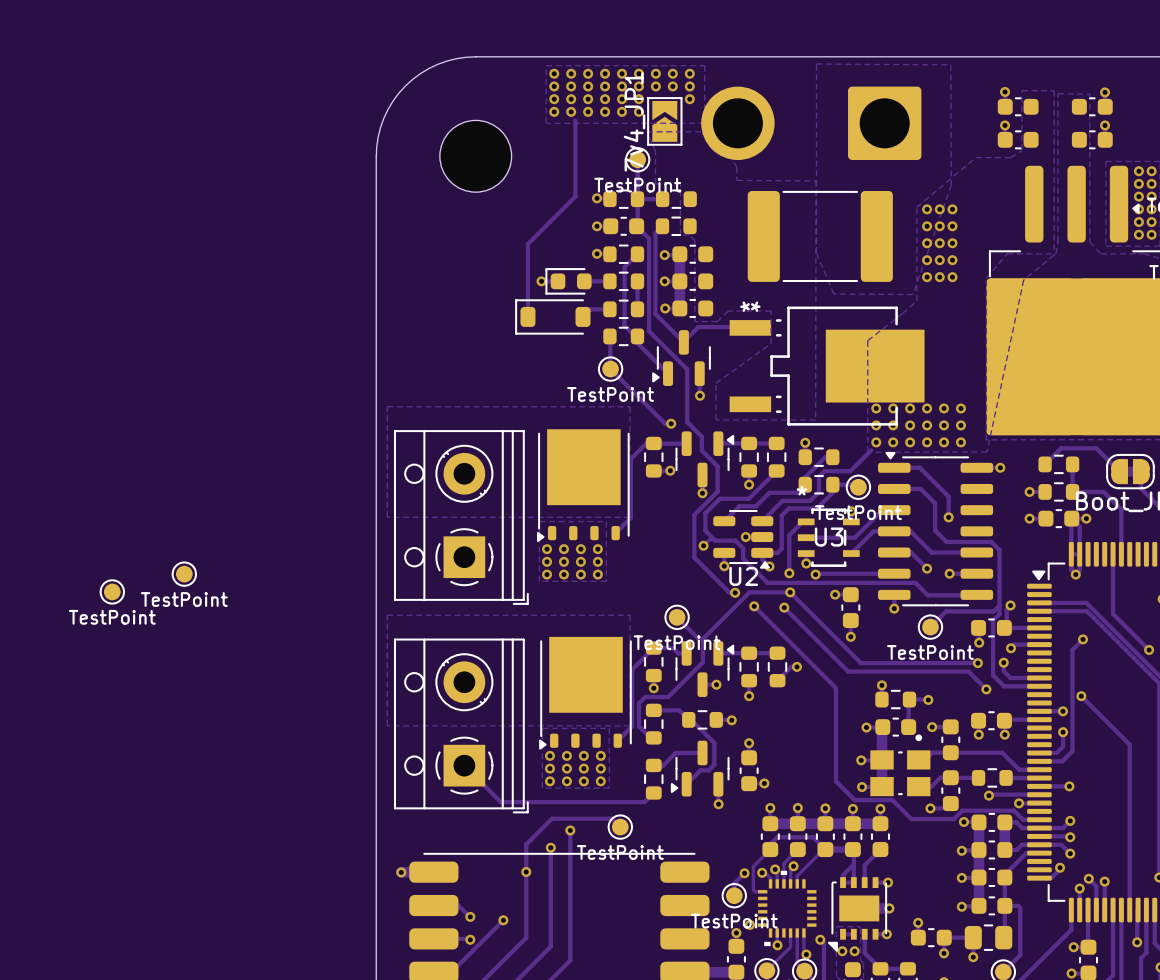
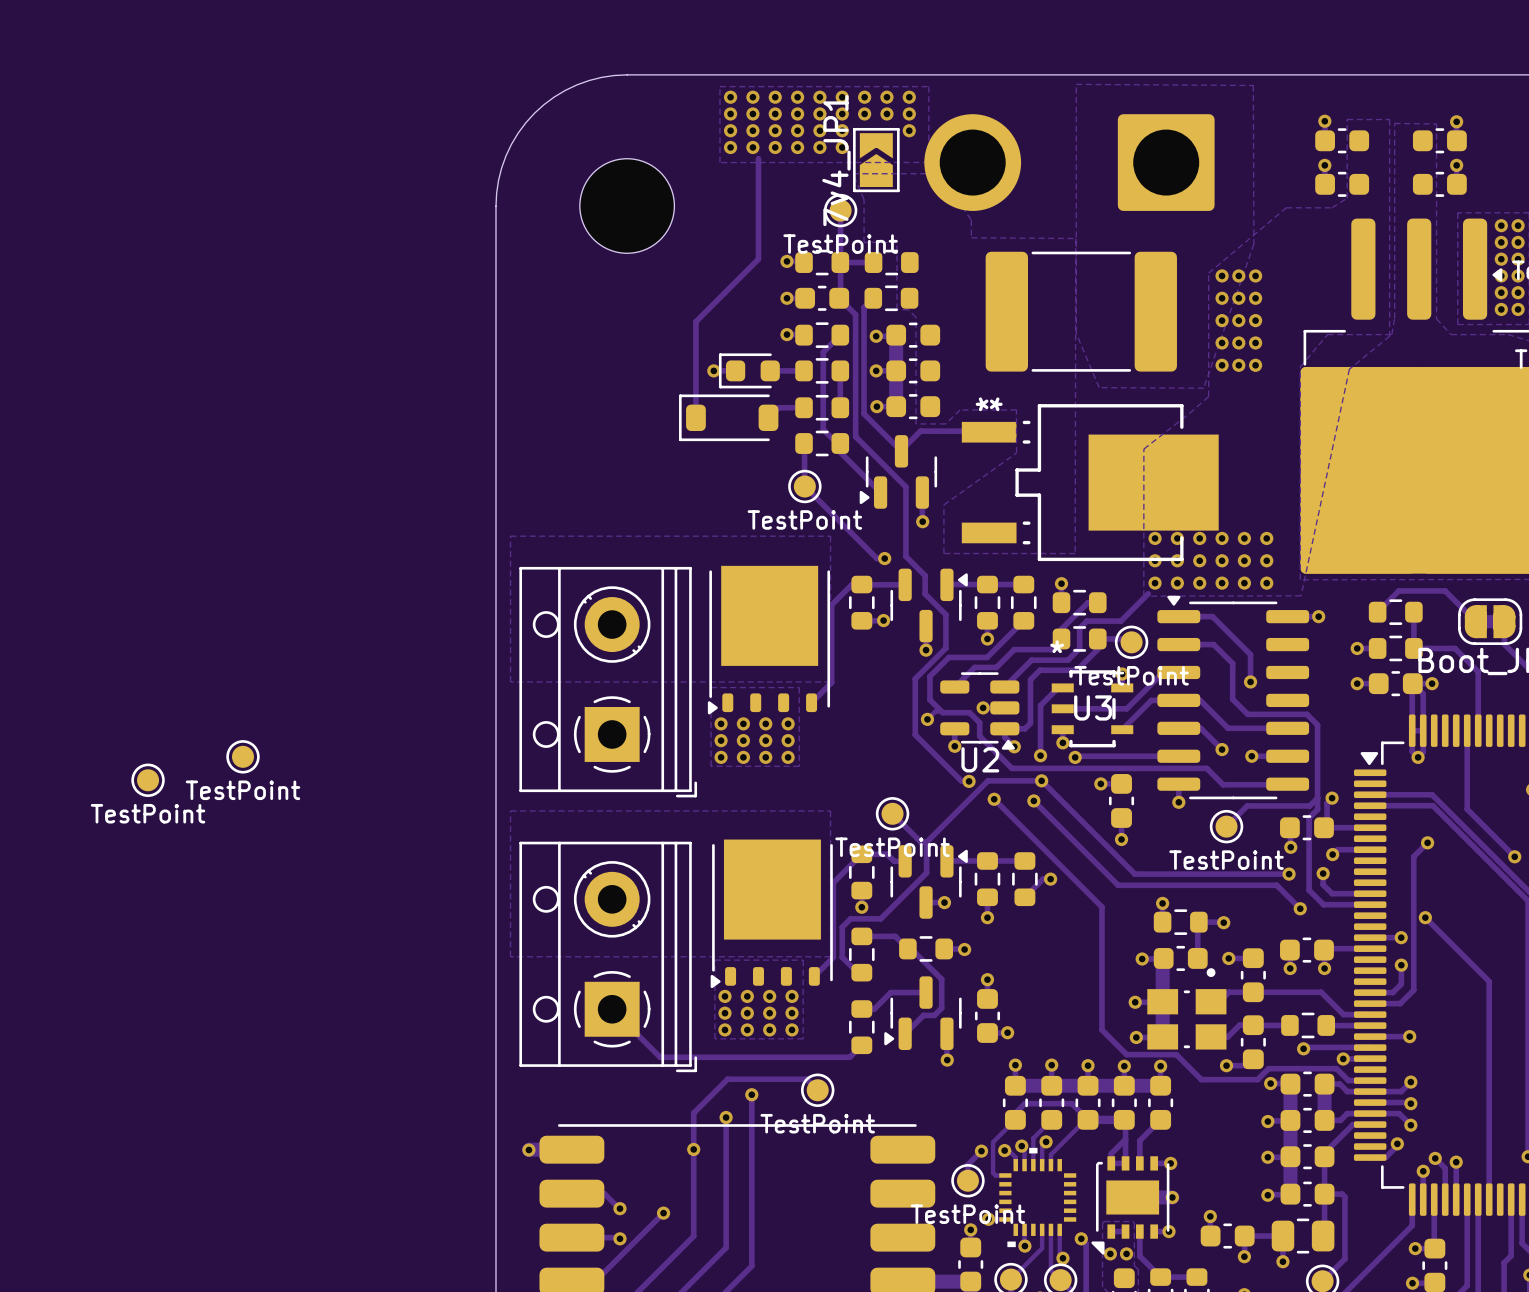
track: (1138, 910) (1137, 942) -> none
via: (1137, 942) -> none

